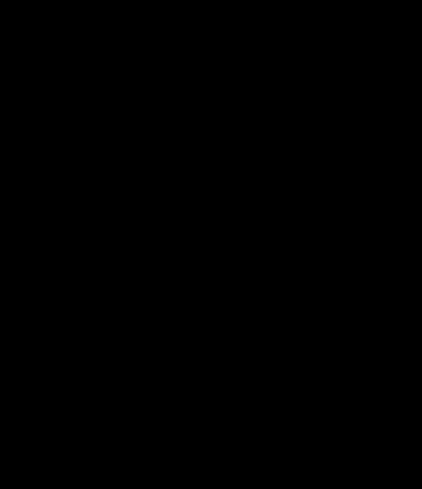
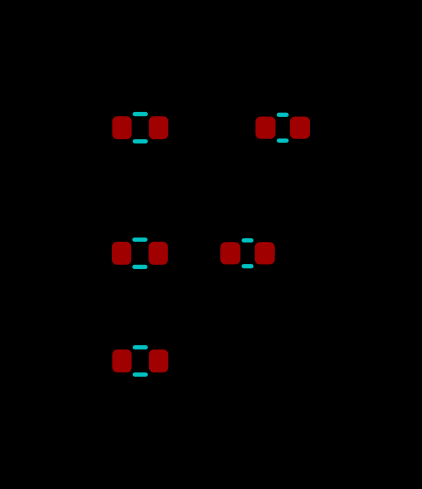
part: none -> (140, 127)
part: none -> (282, 127)
part: none -> (139, 253)
part: none -> (247, 253)
part: none -> (140, 360)

